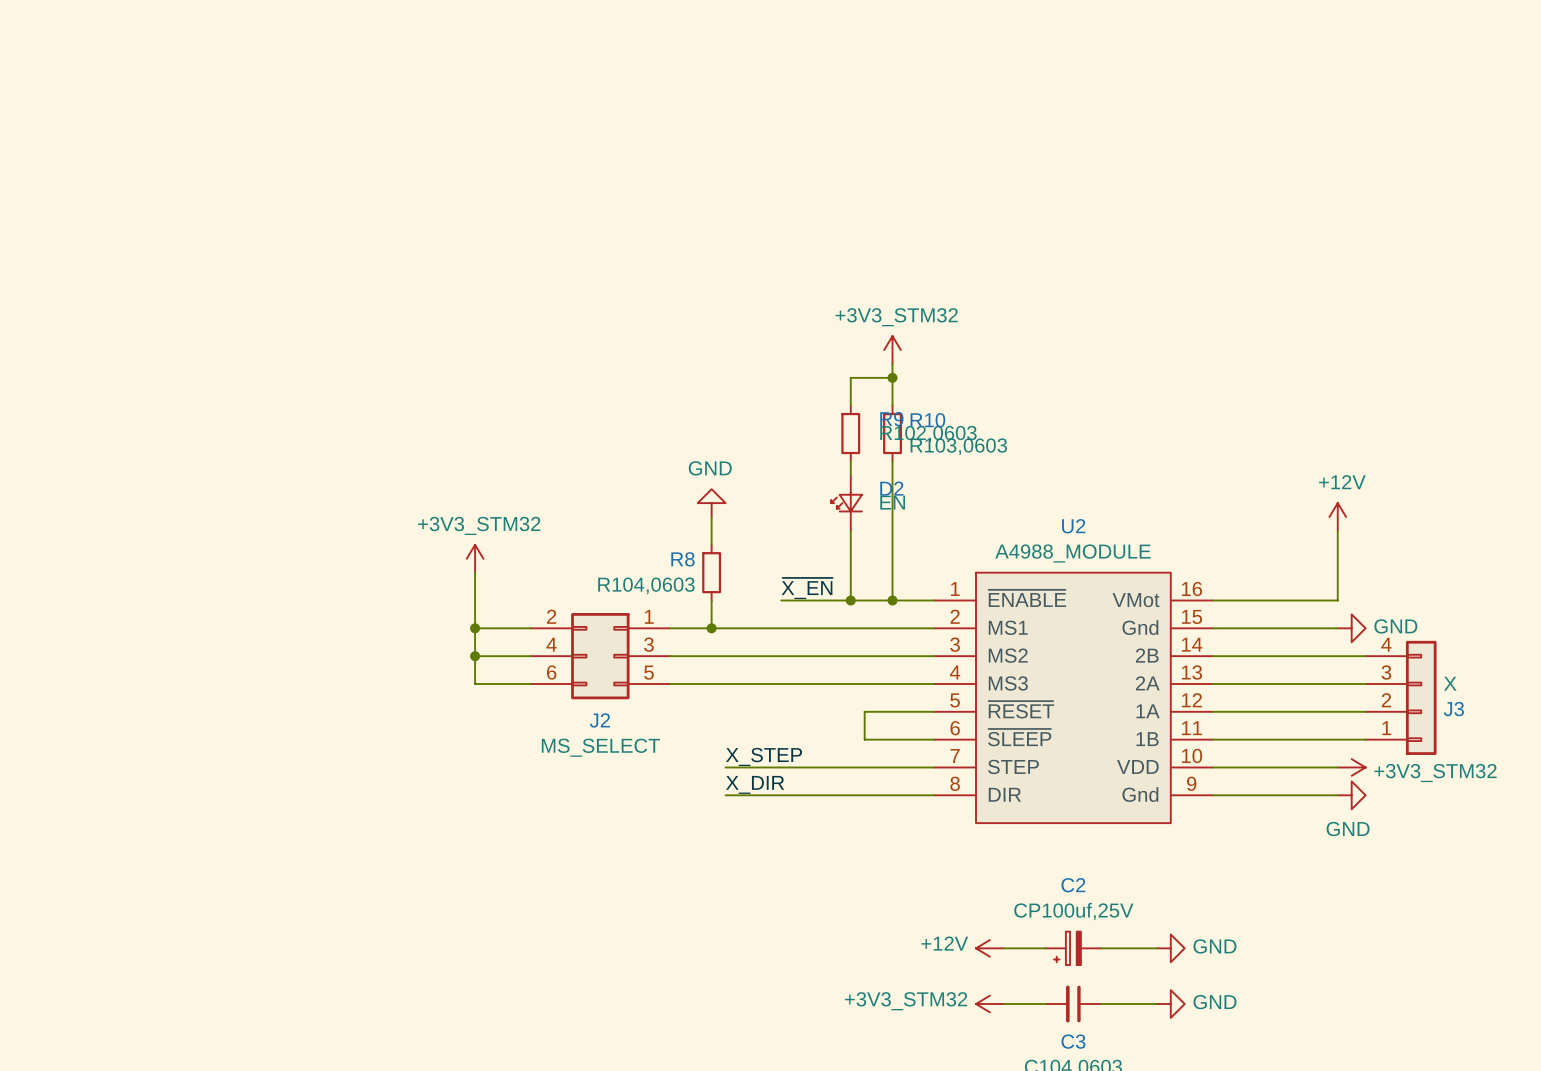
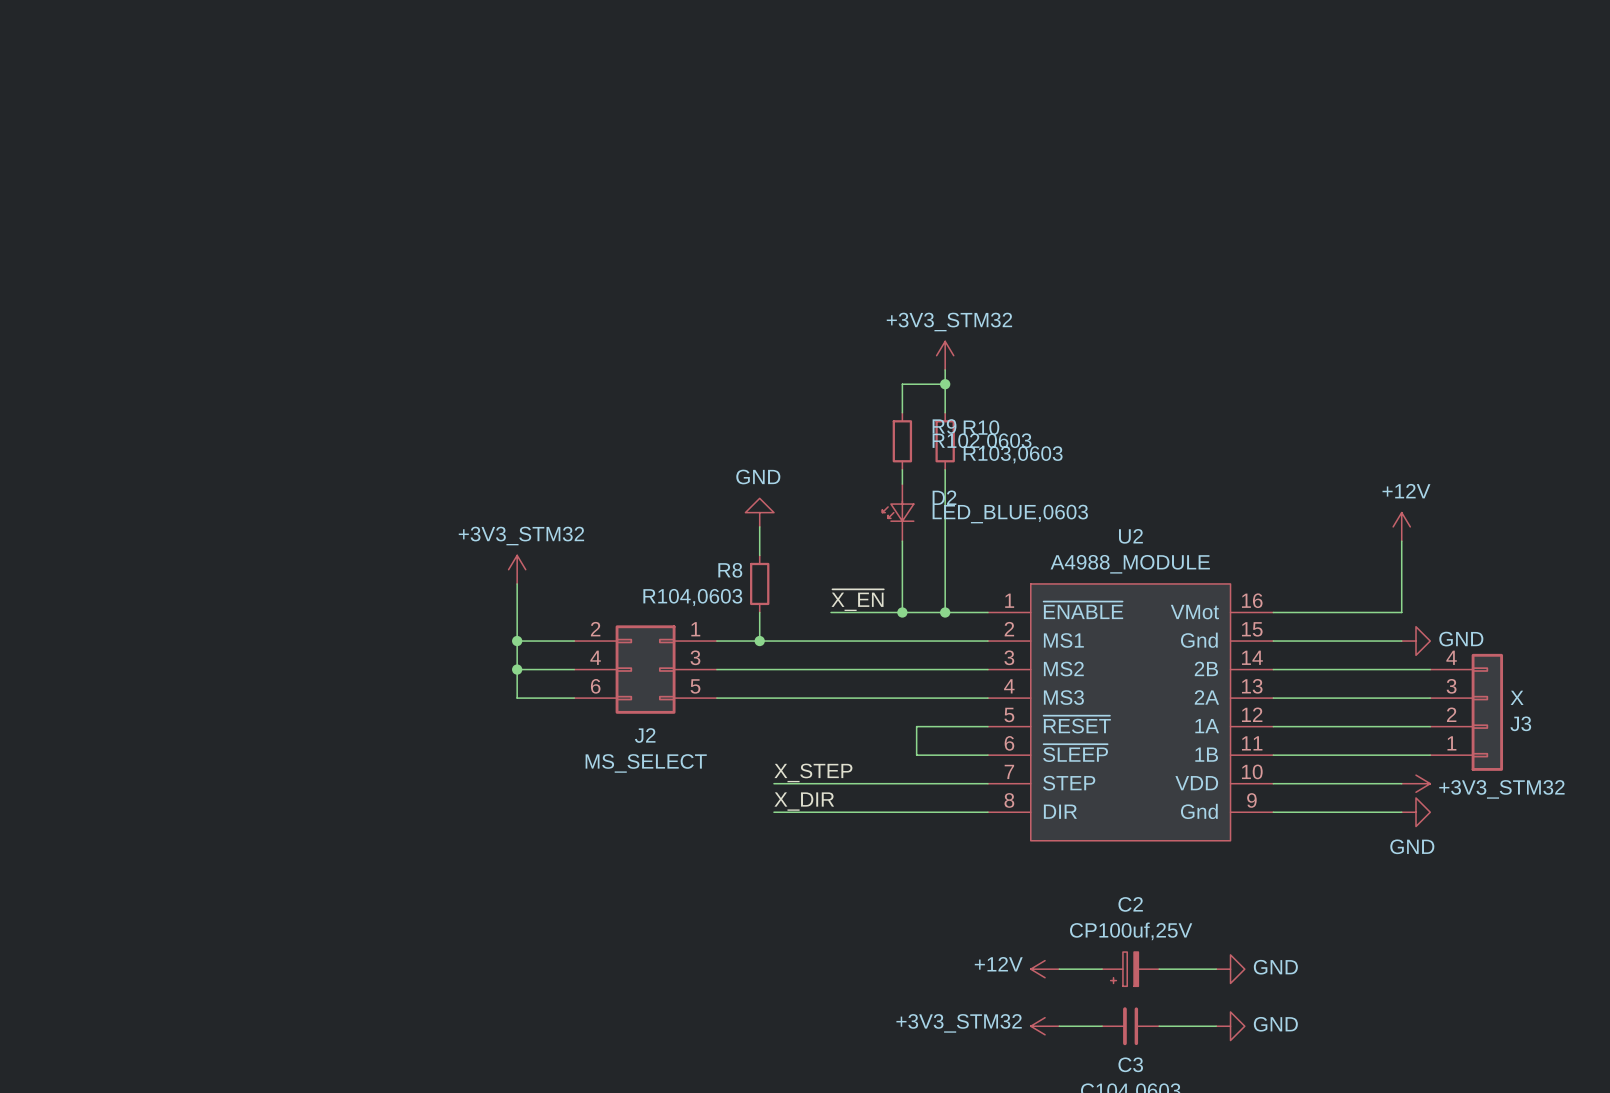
D2 value: EN (892, 502) -> LED_BLUE,0603 (1010, 514)

